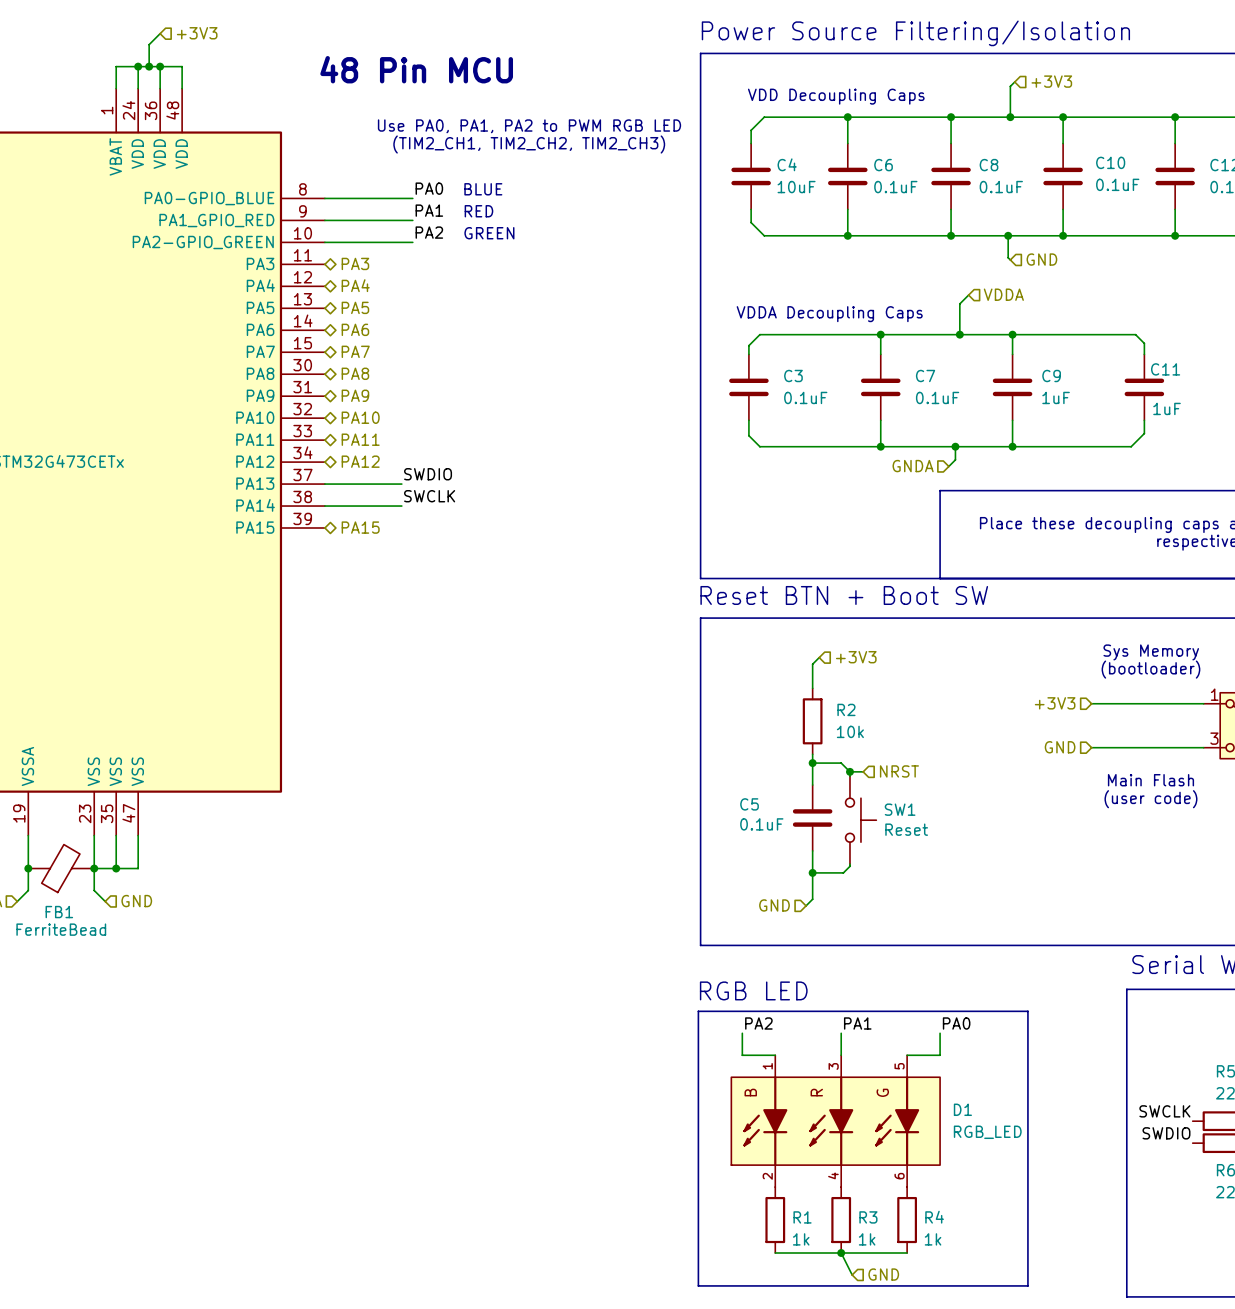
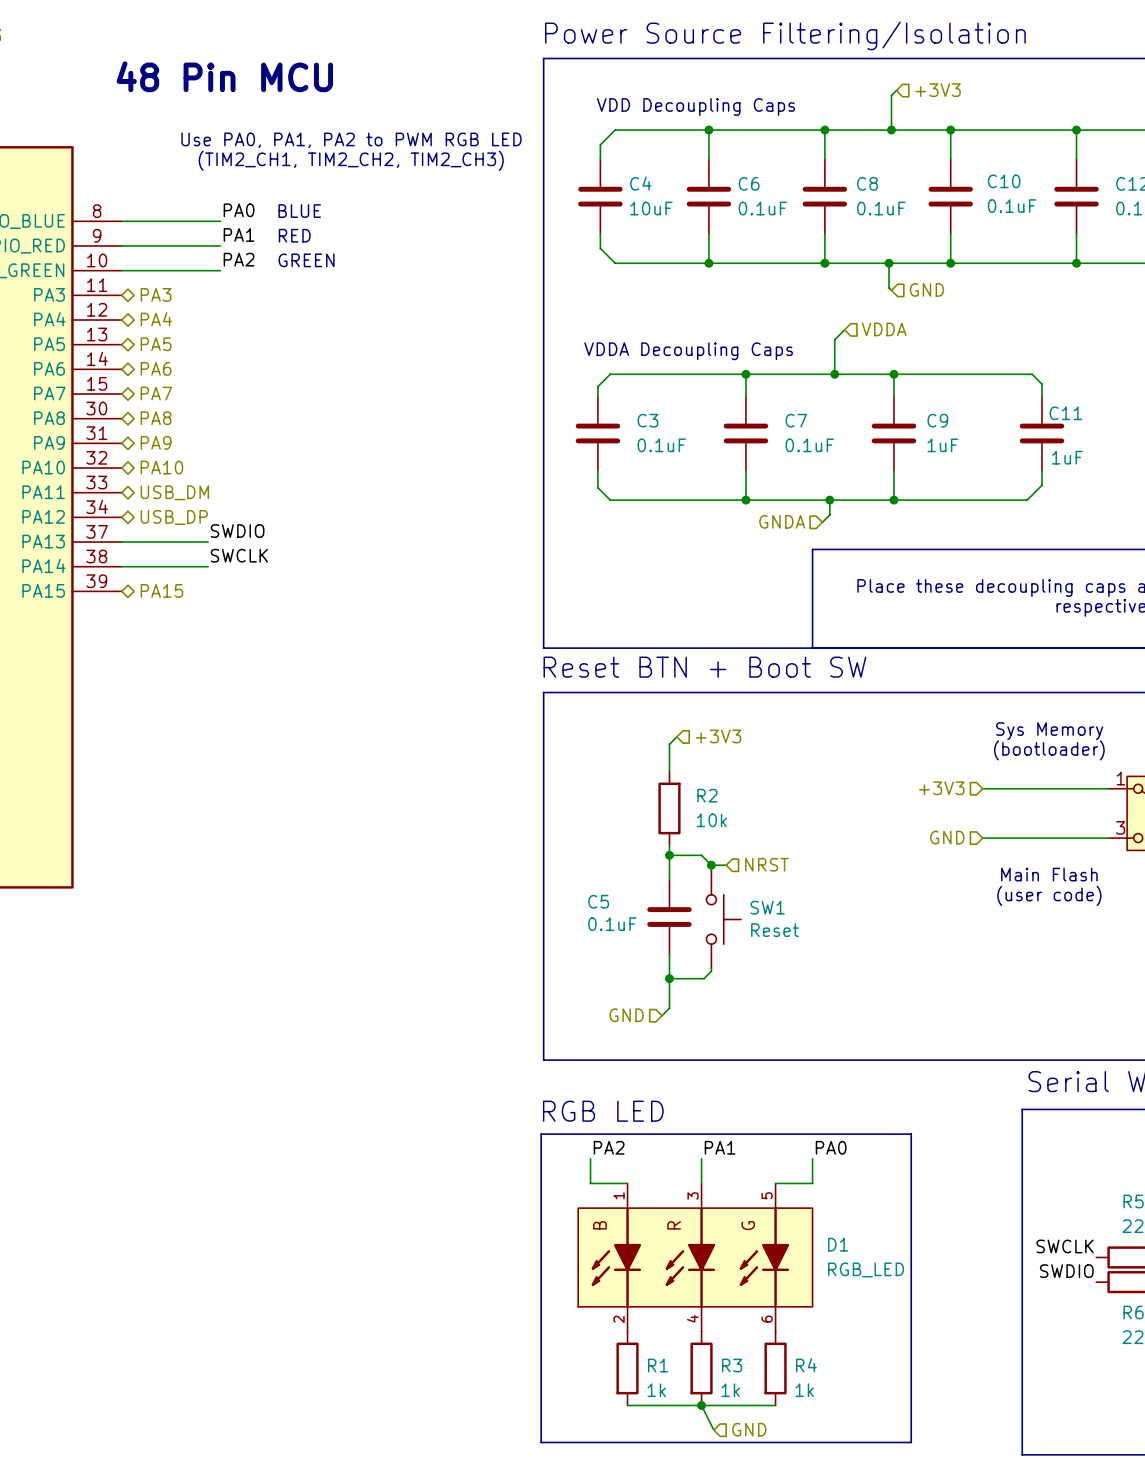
hierarchical label: PA11 (360, 439) -> USB_DM (174, 492)
hierarchical label: PA12 (360, 461) -> USB_DP (174, 517)

